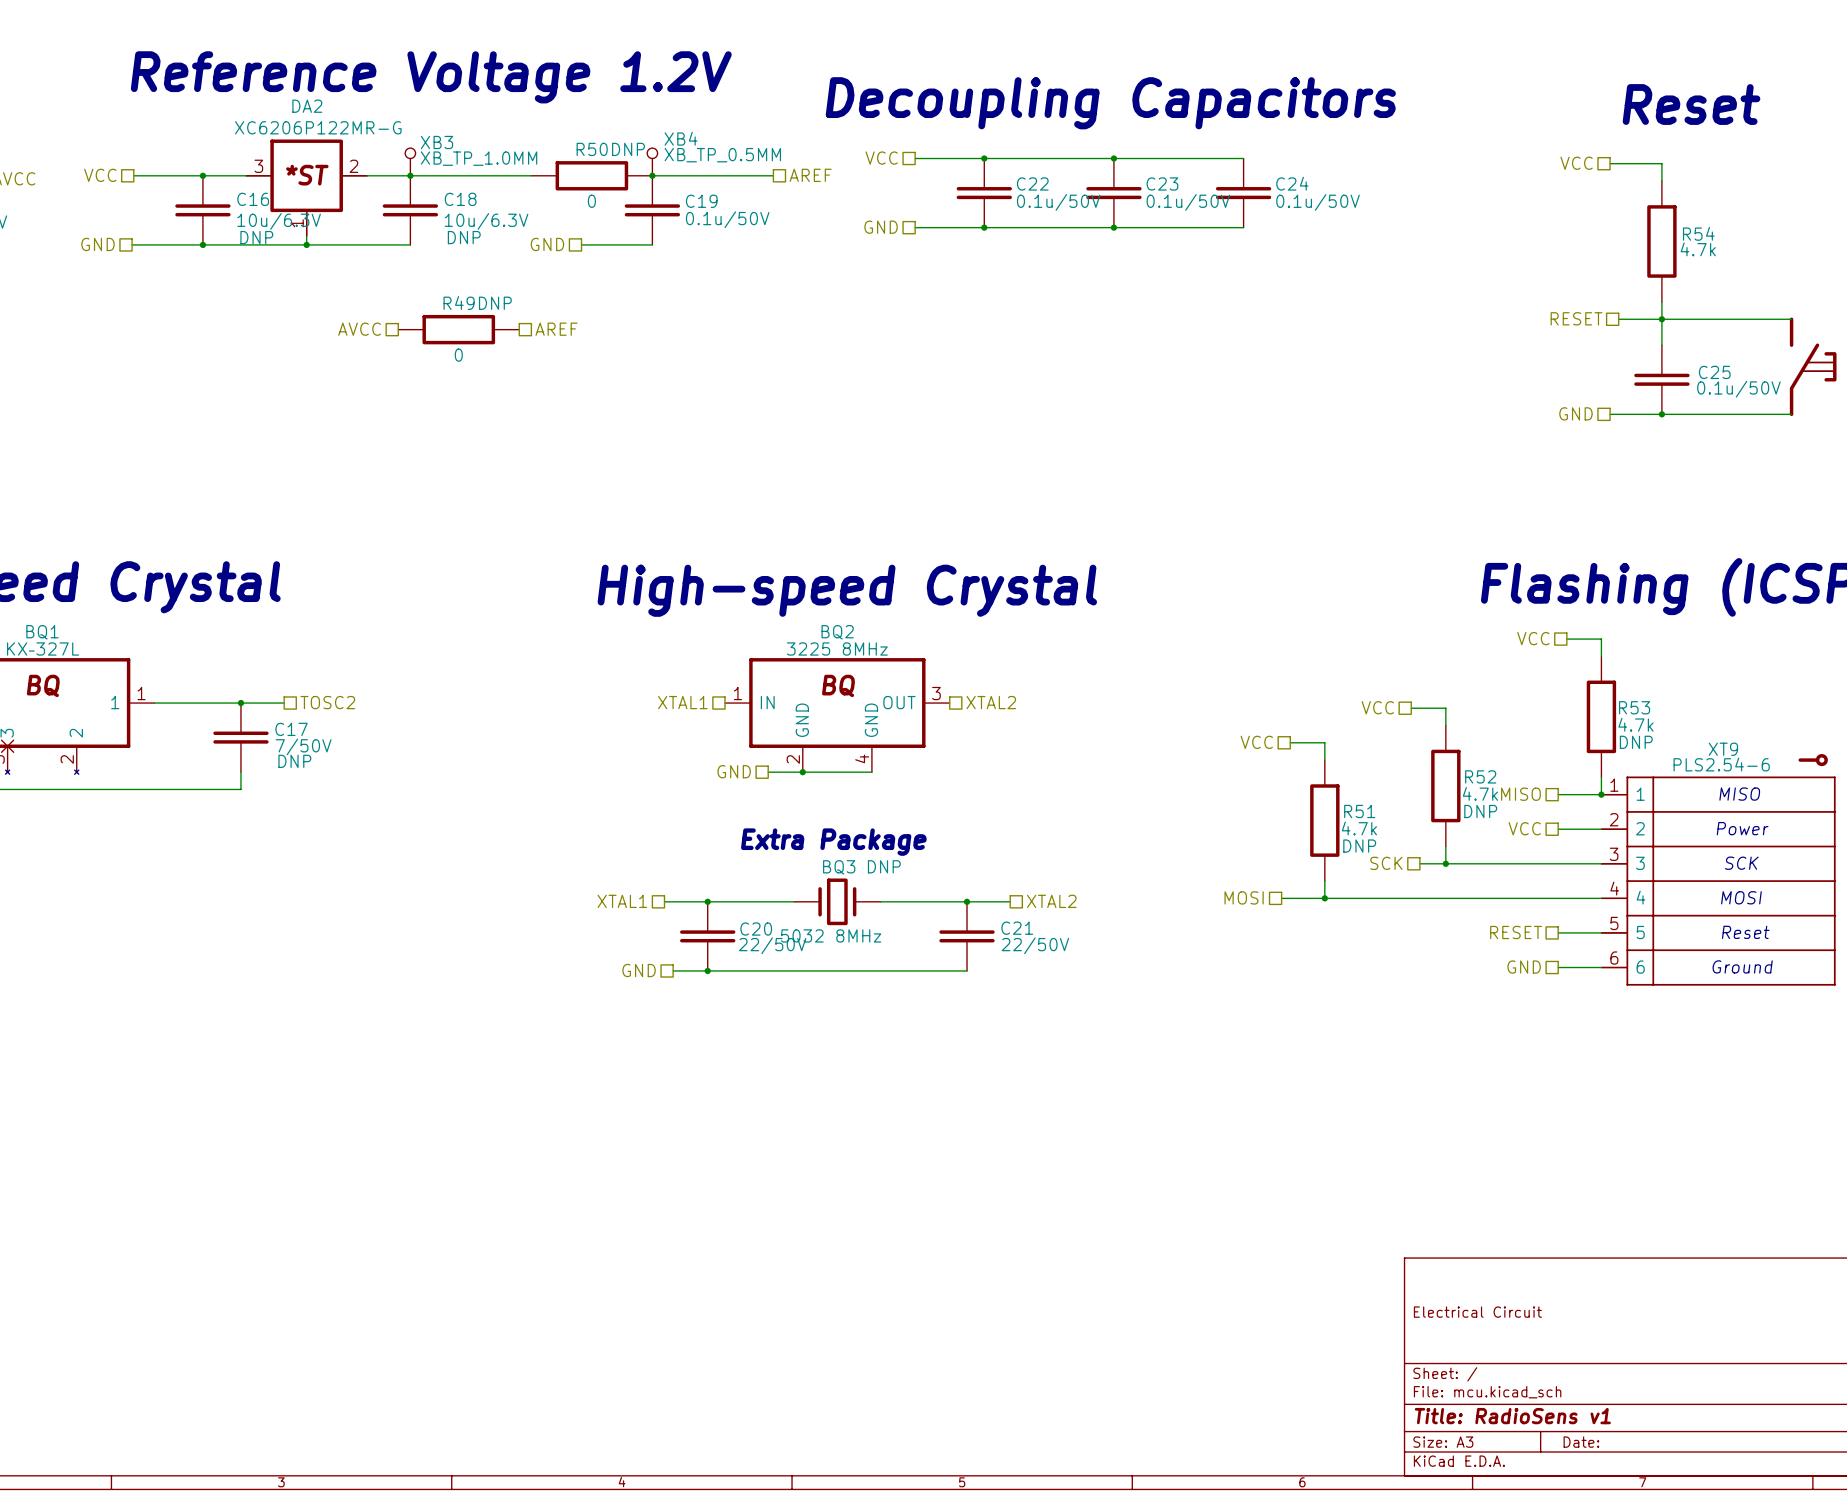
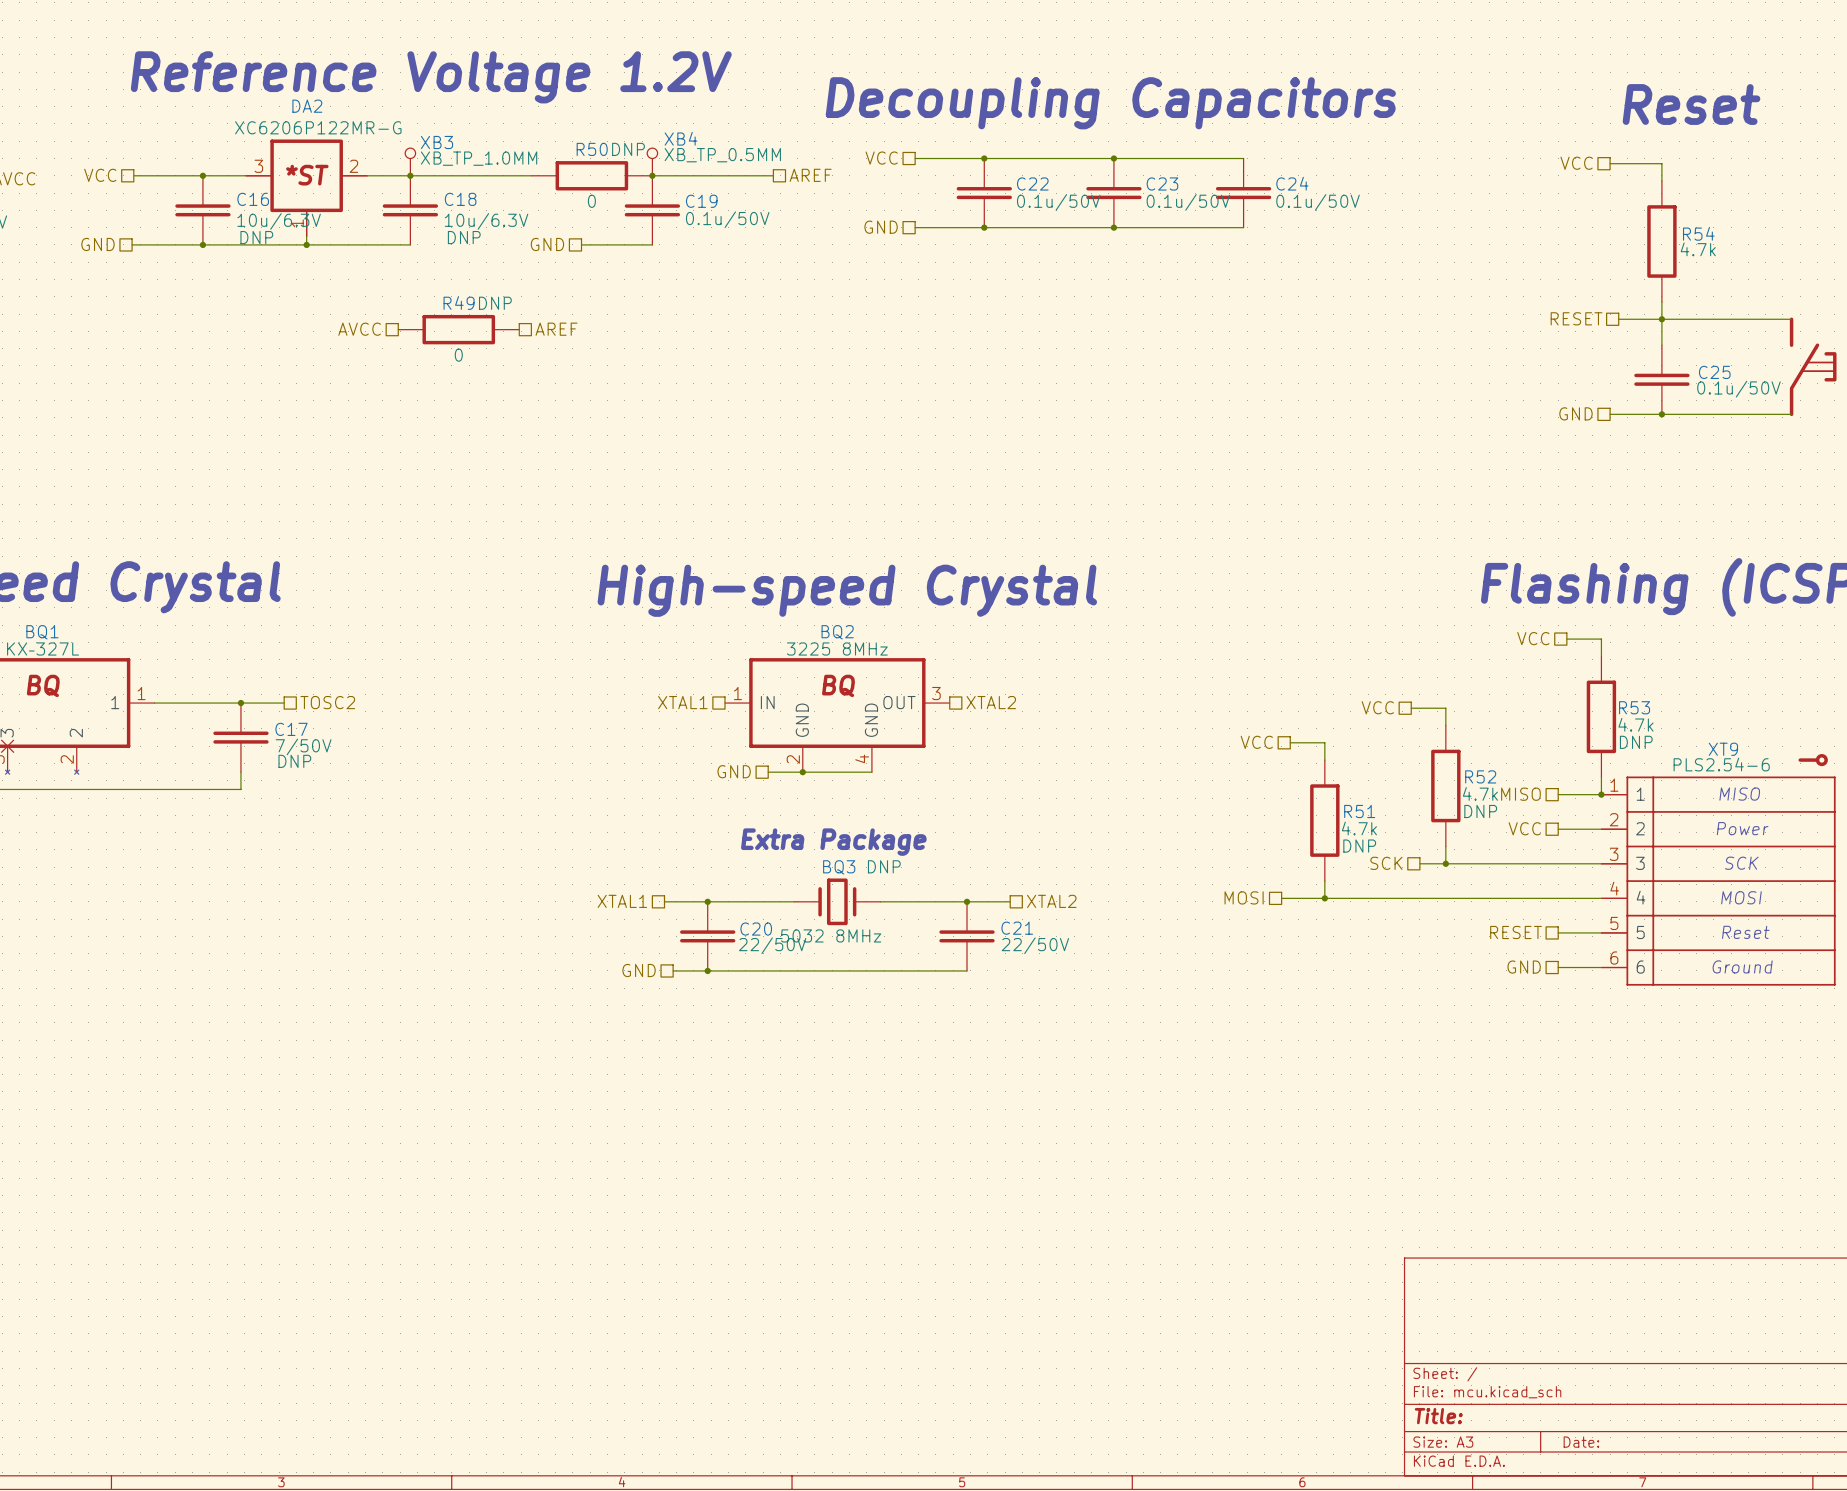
title block: Electrical Circuit (1477, 1312) -> none
title block: Title: RadioSens v1 (1512, 1416) -> Title: (1438, 1416)

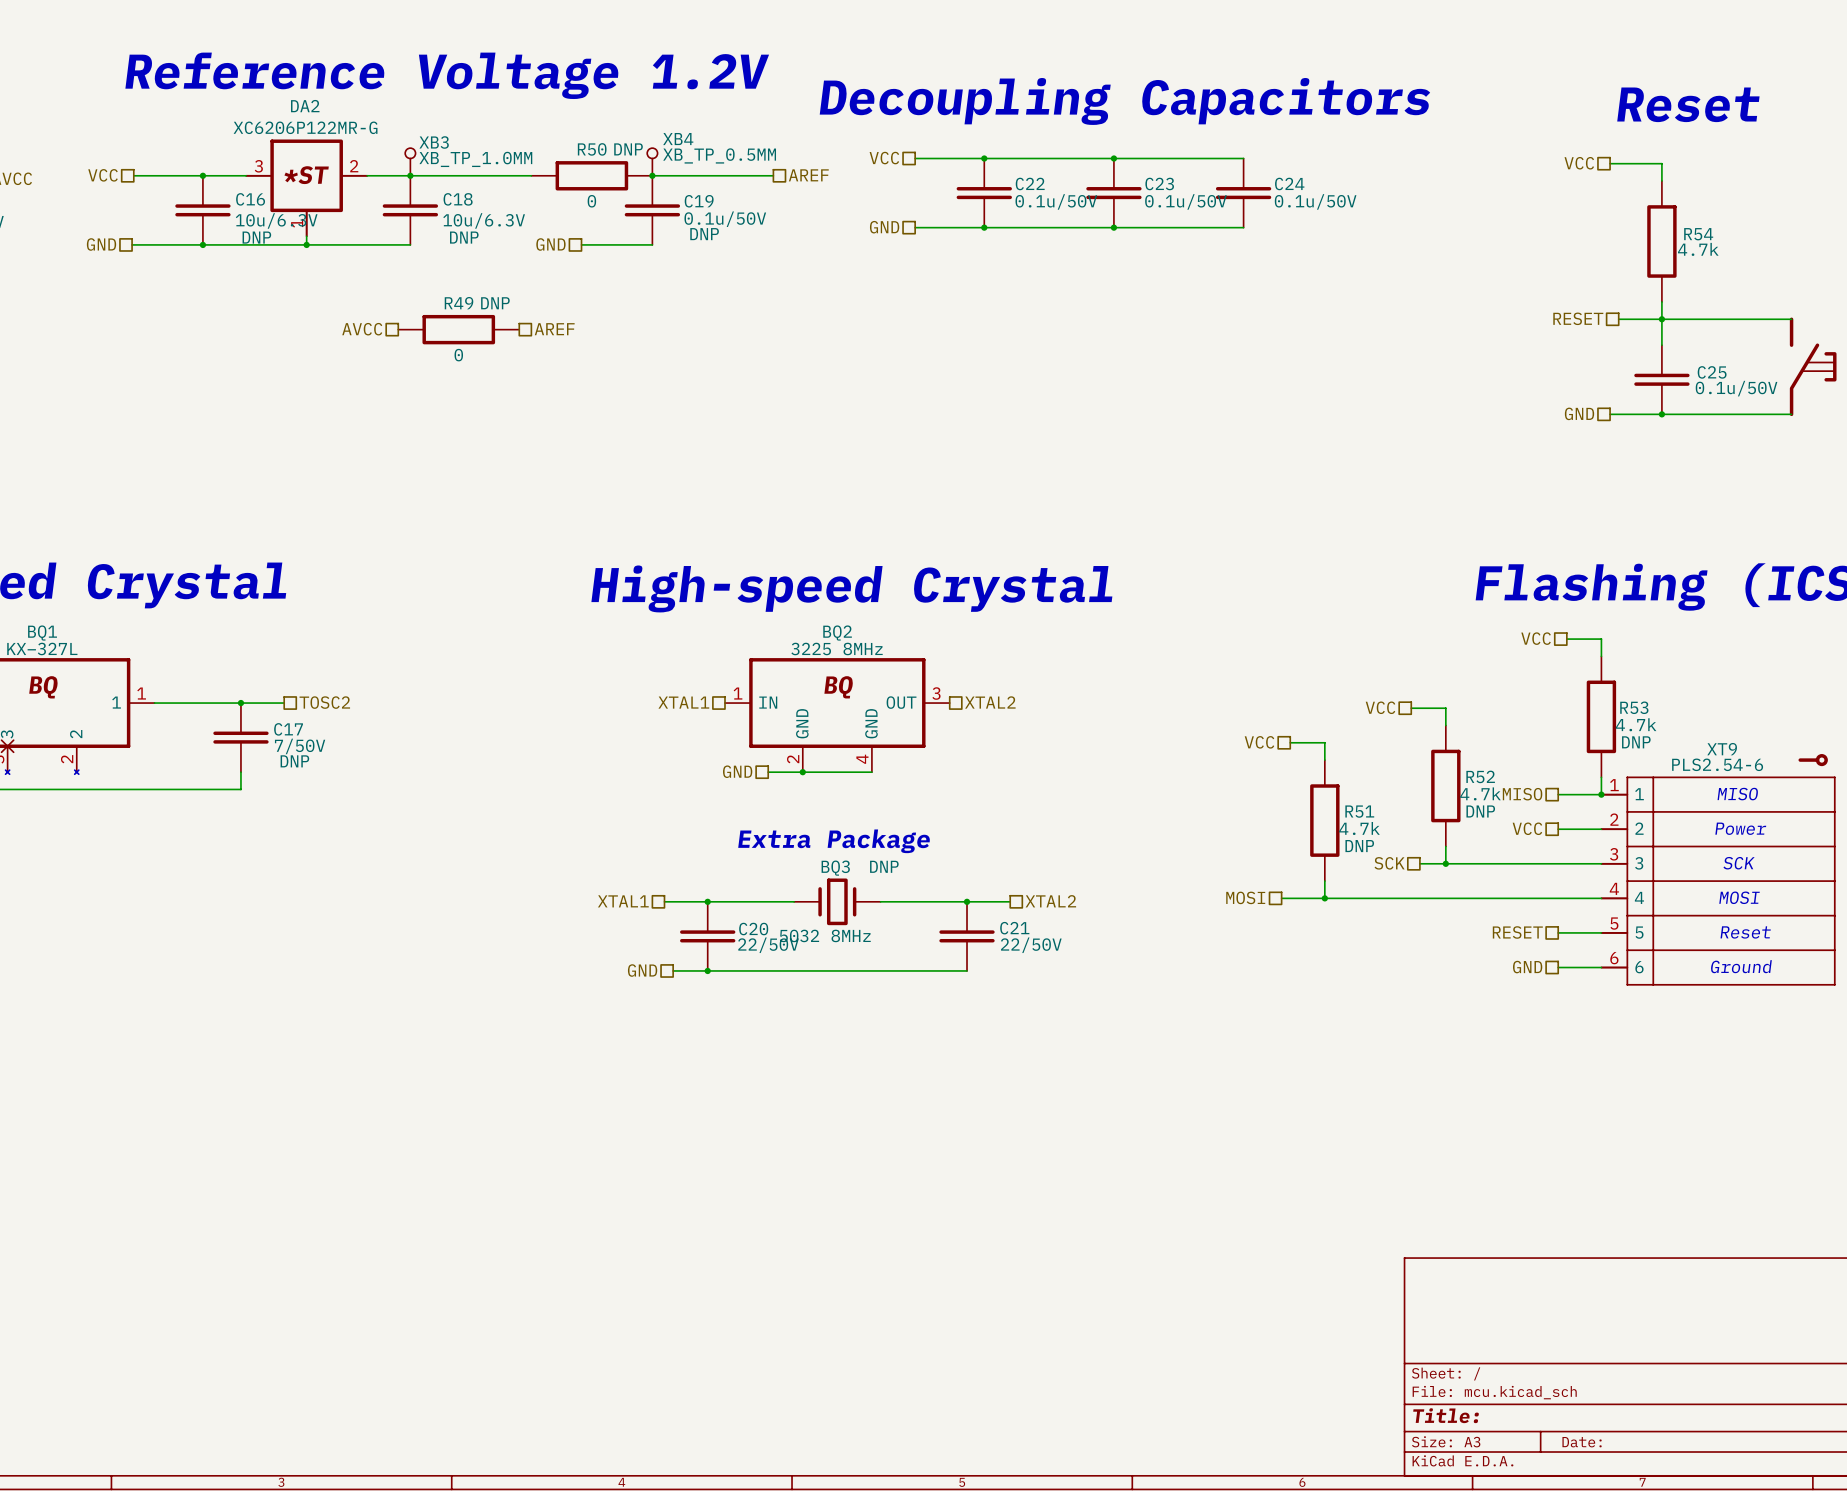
C19 text: none -> DNP (704, 234)

